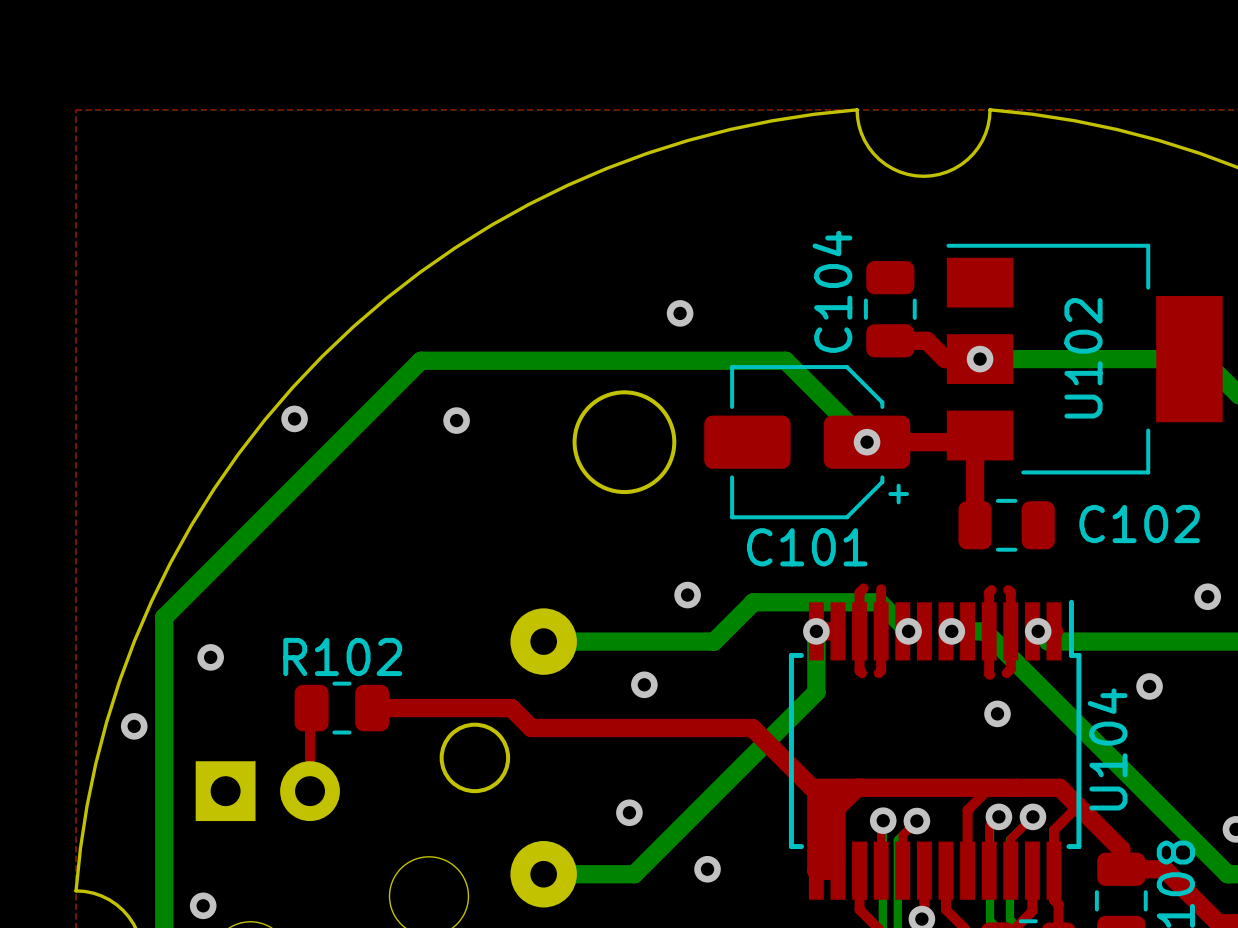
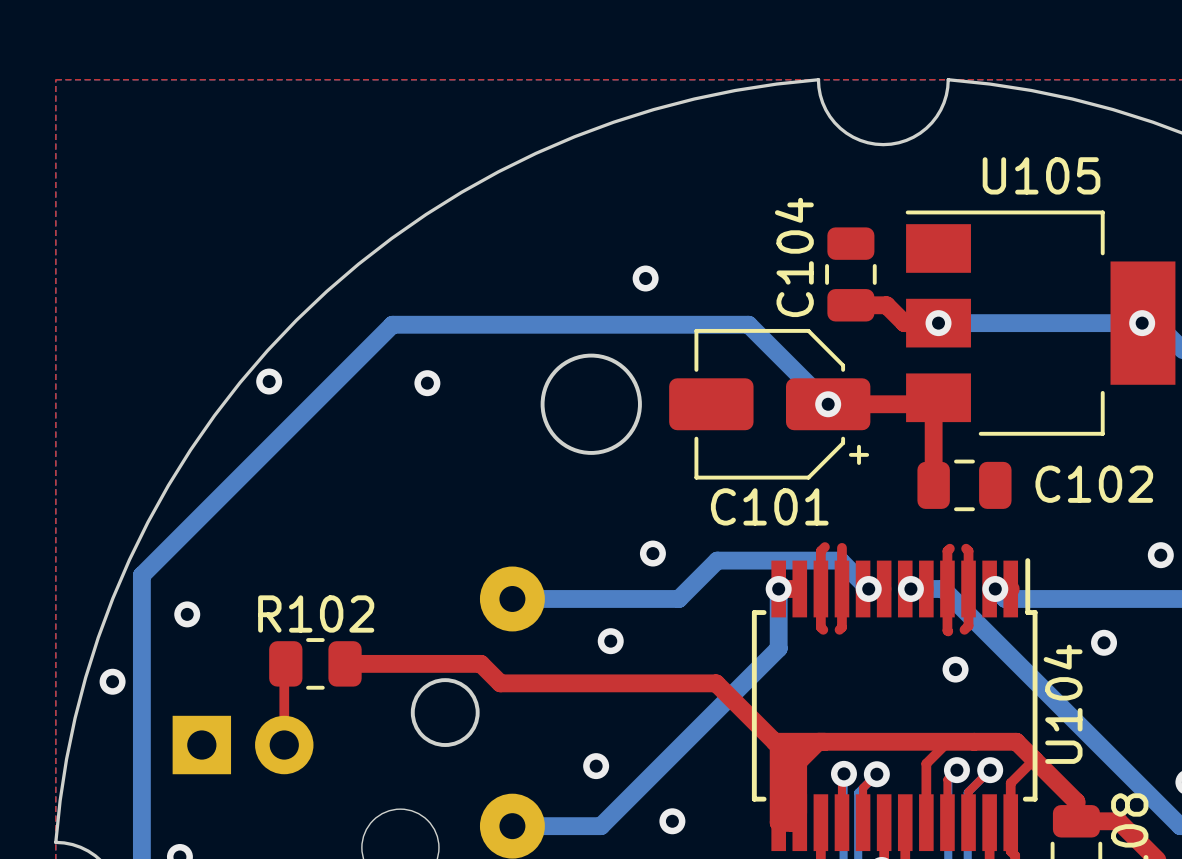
U102 name: U102 (1083, 358) -> U105 (1041, 175)
via: none -> (1142, 323)

